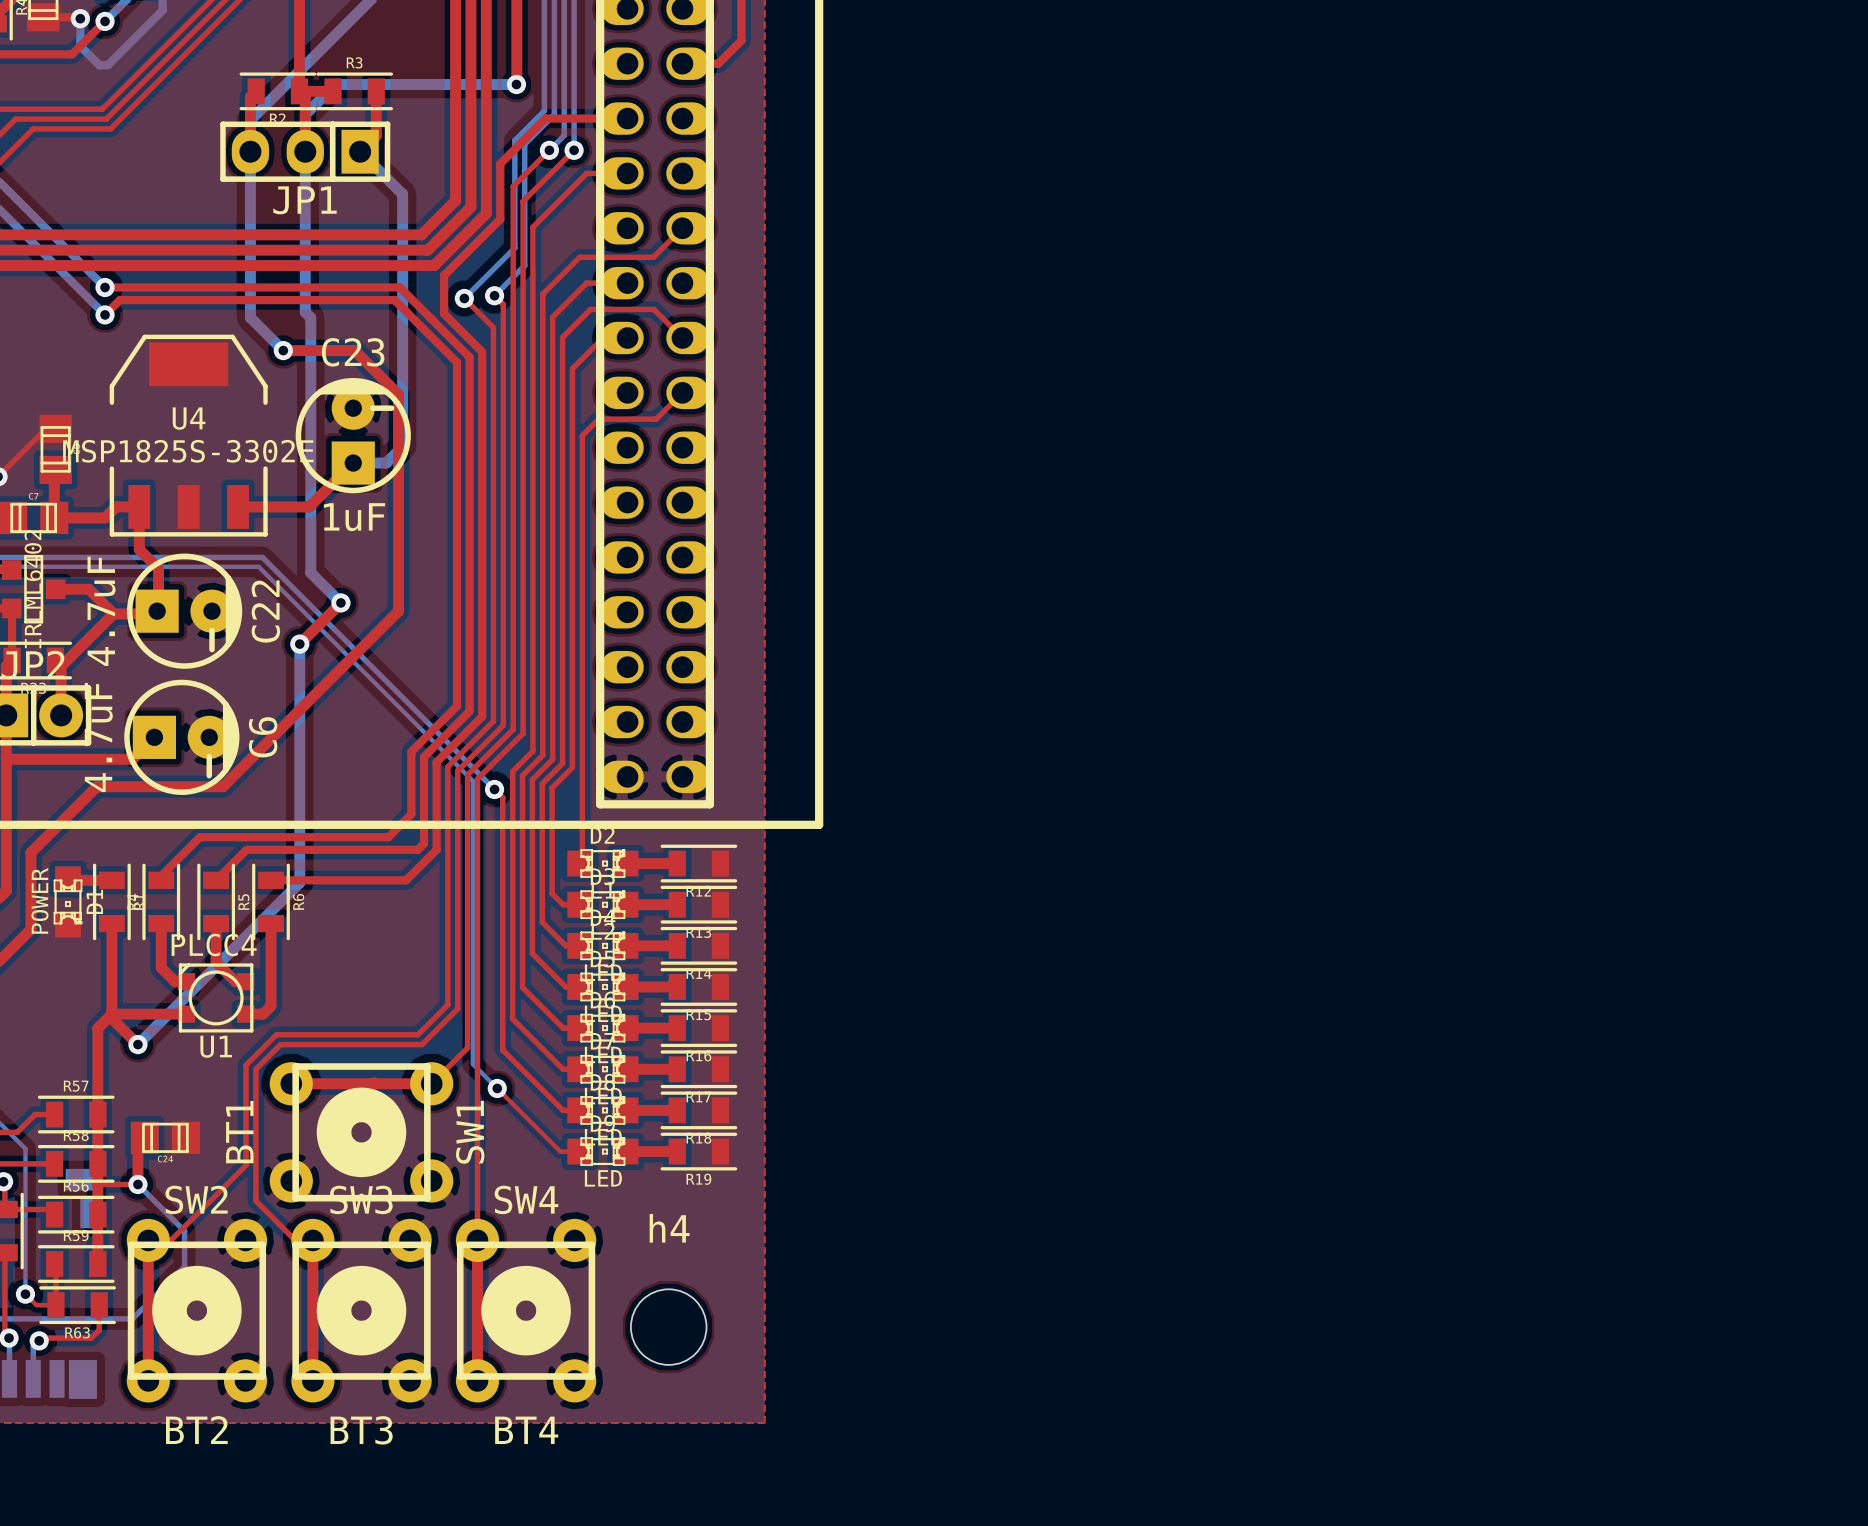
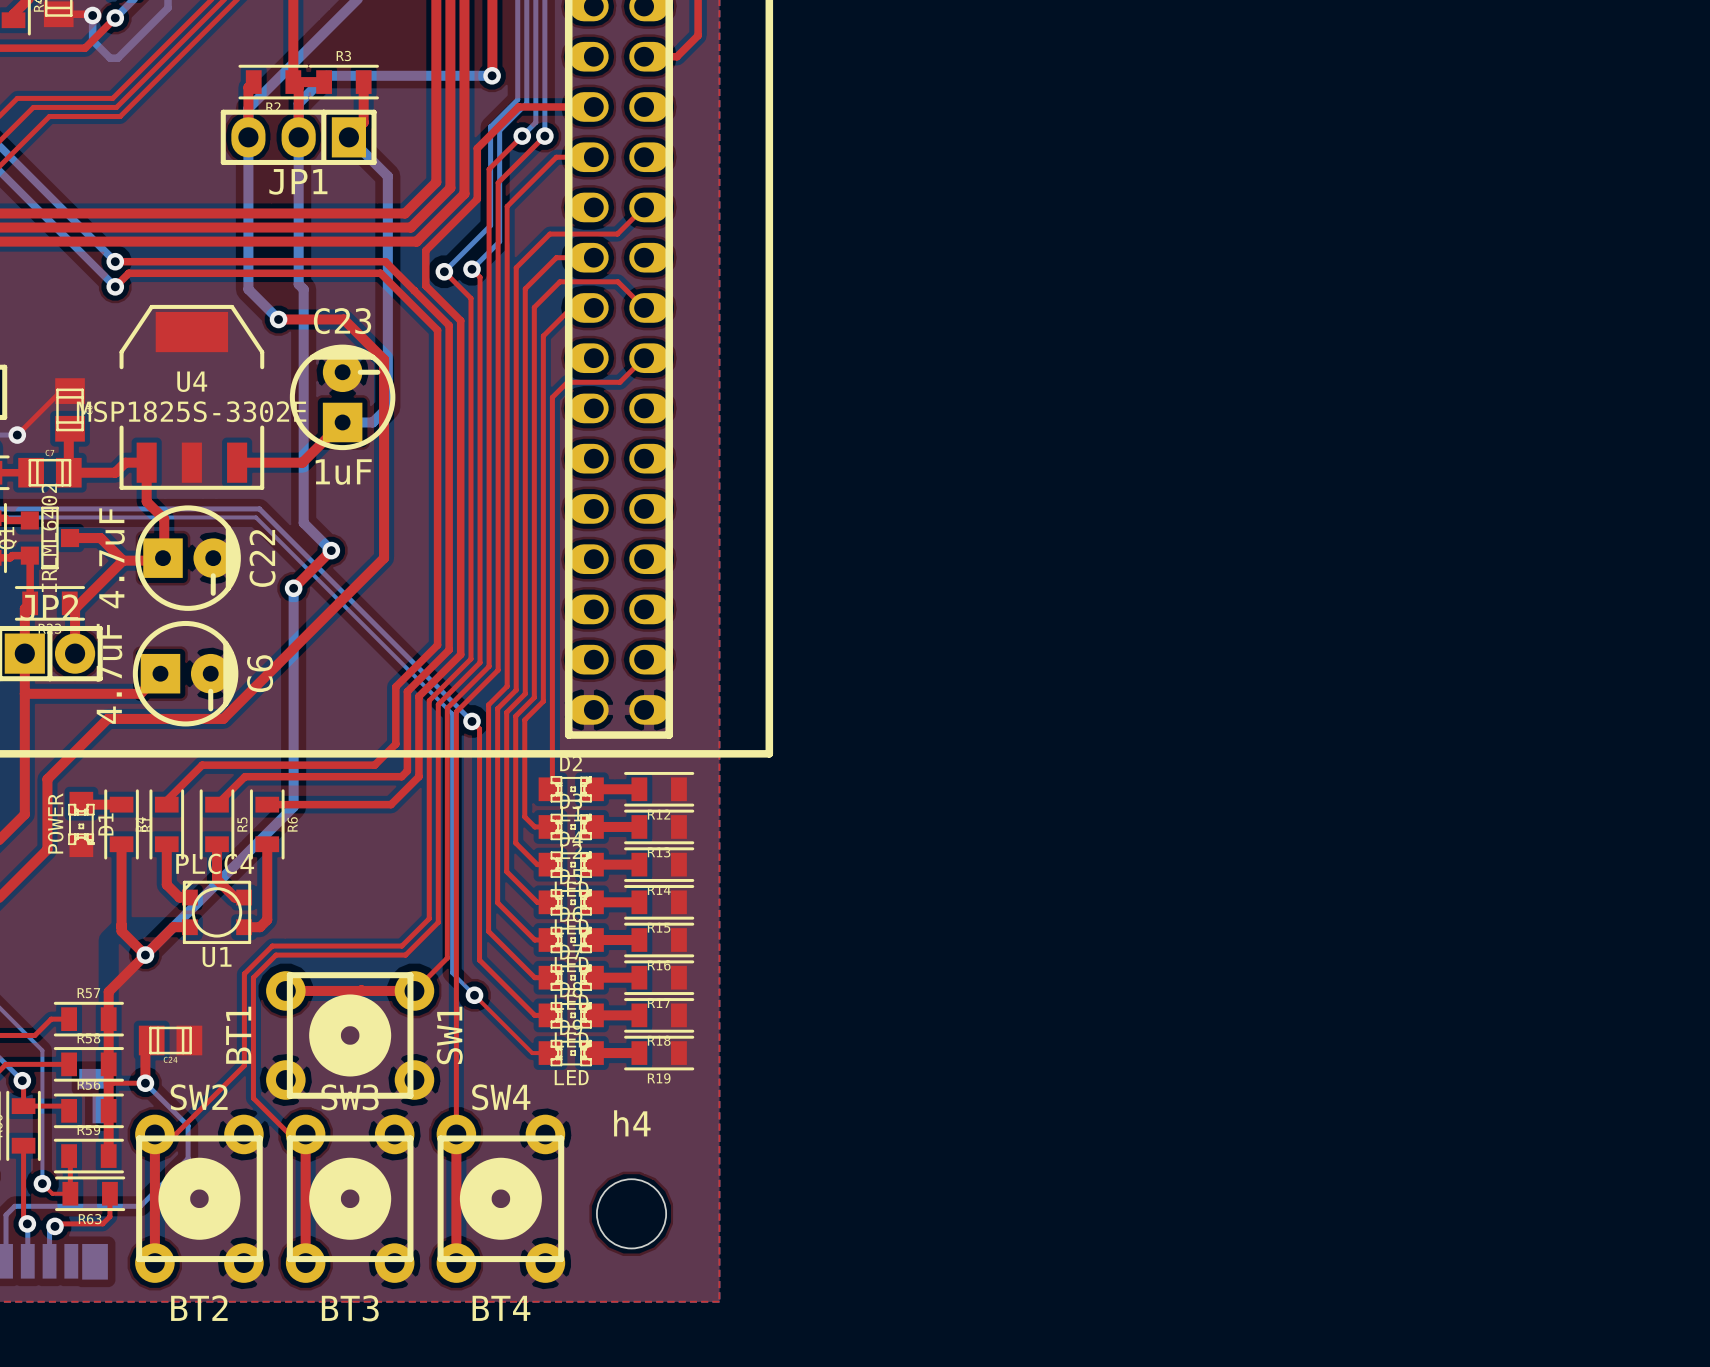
top track: (168, 1014) (111, 1014) (97, 1028) (97, 1084) -> (173, 927) (108, 991)

